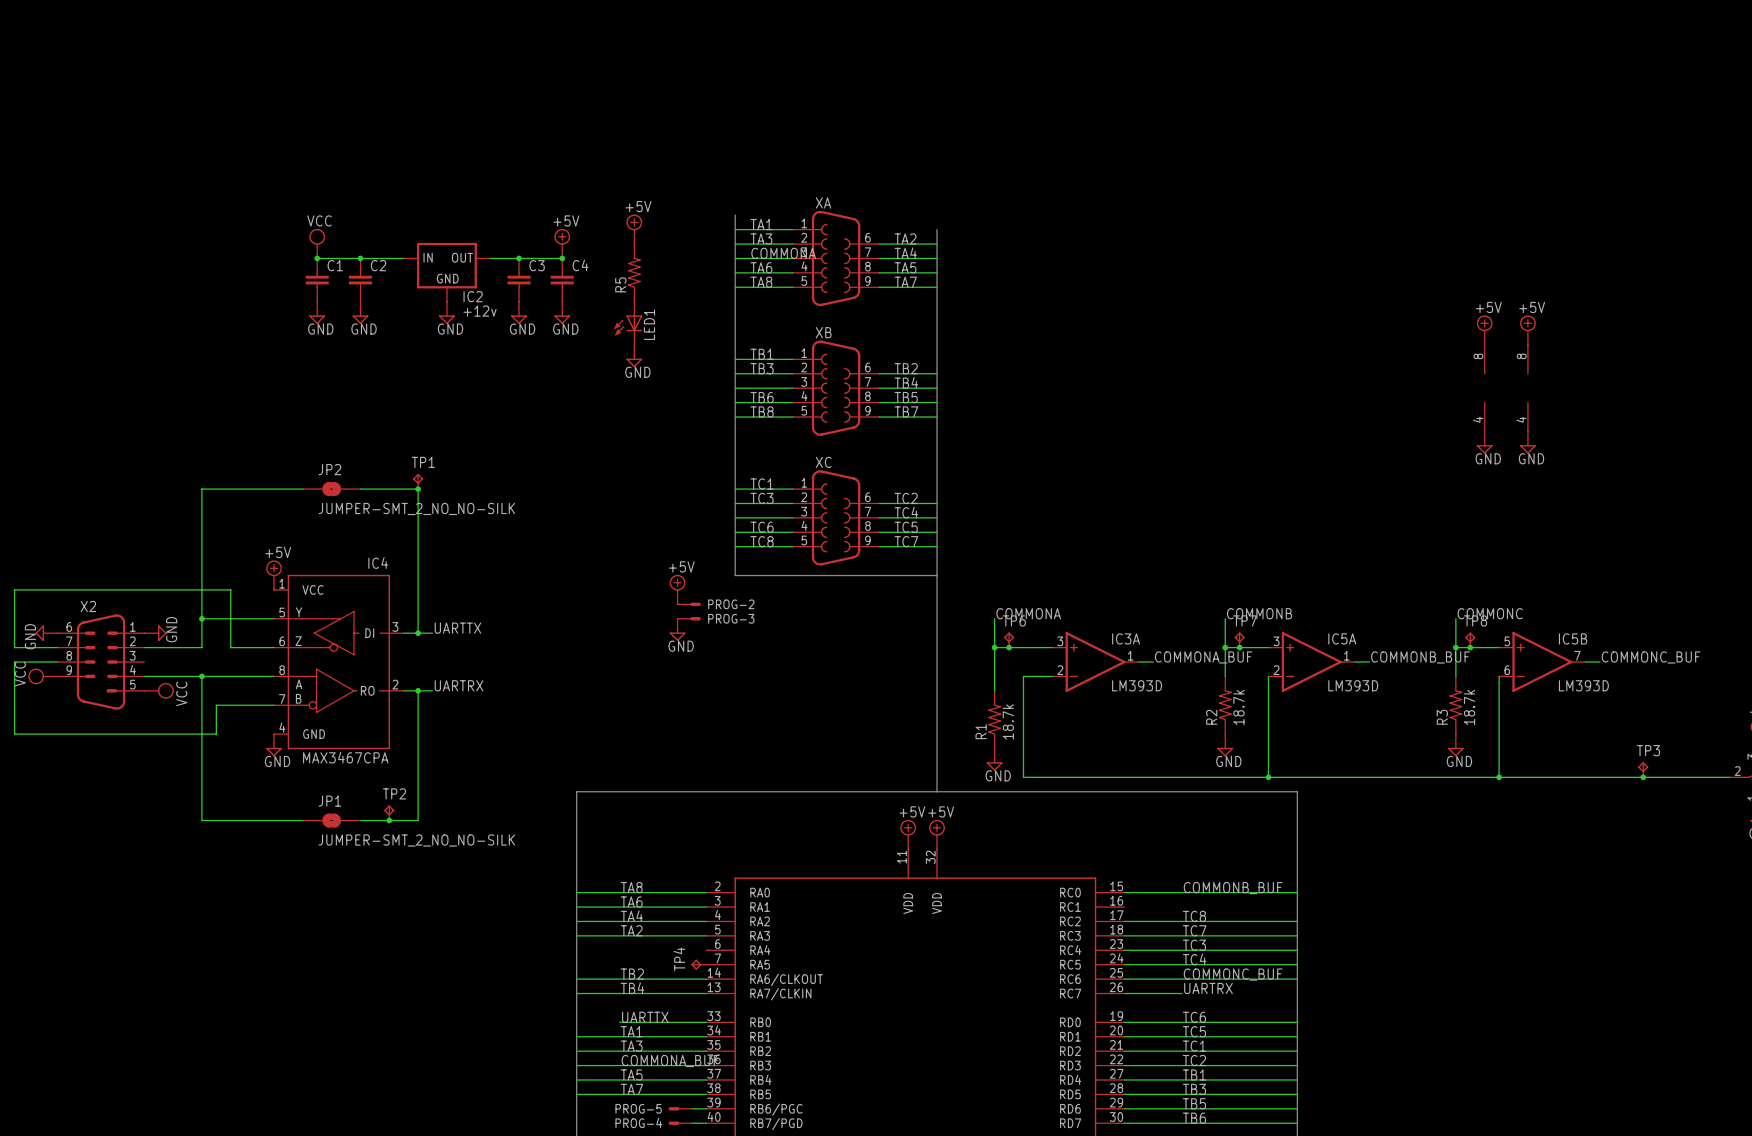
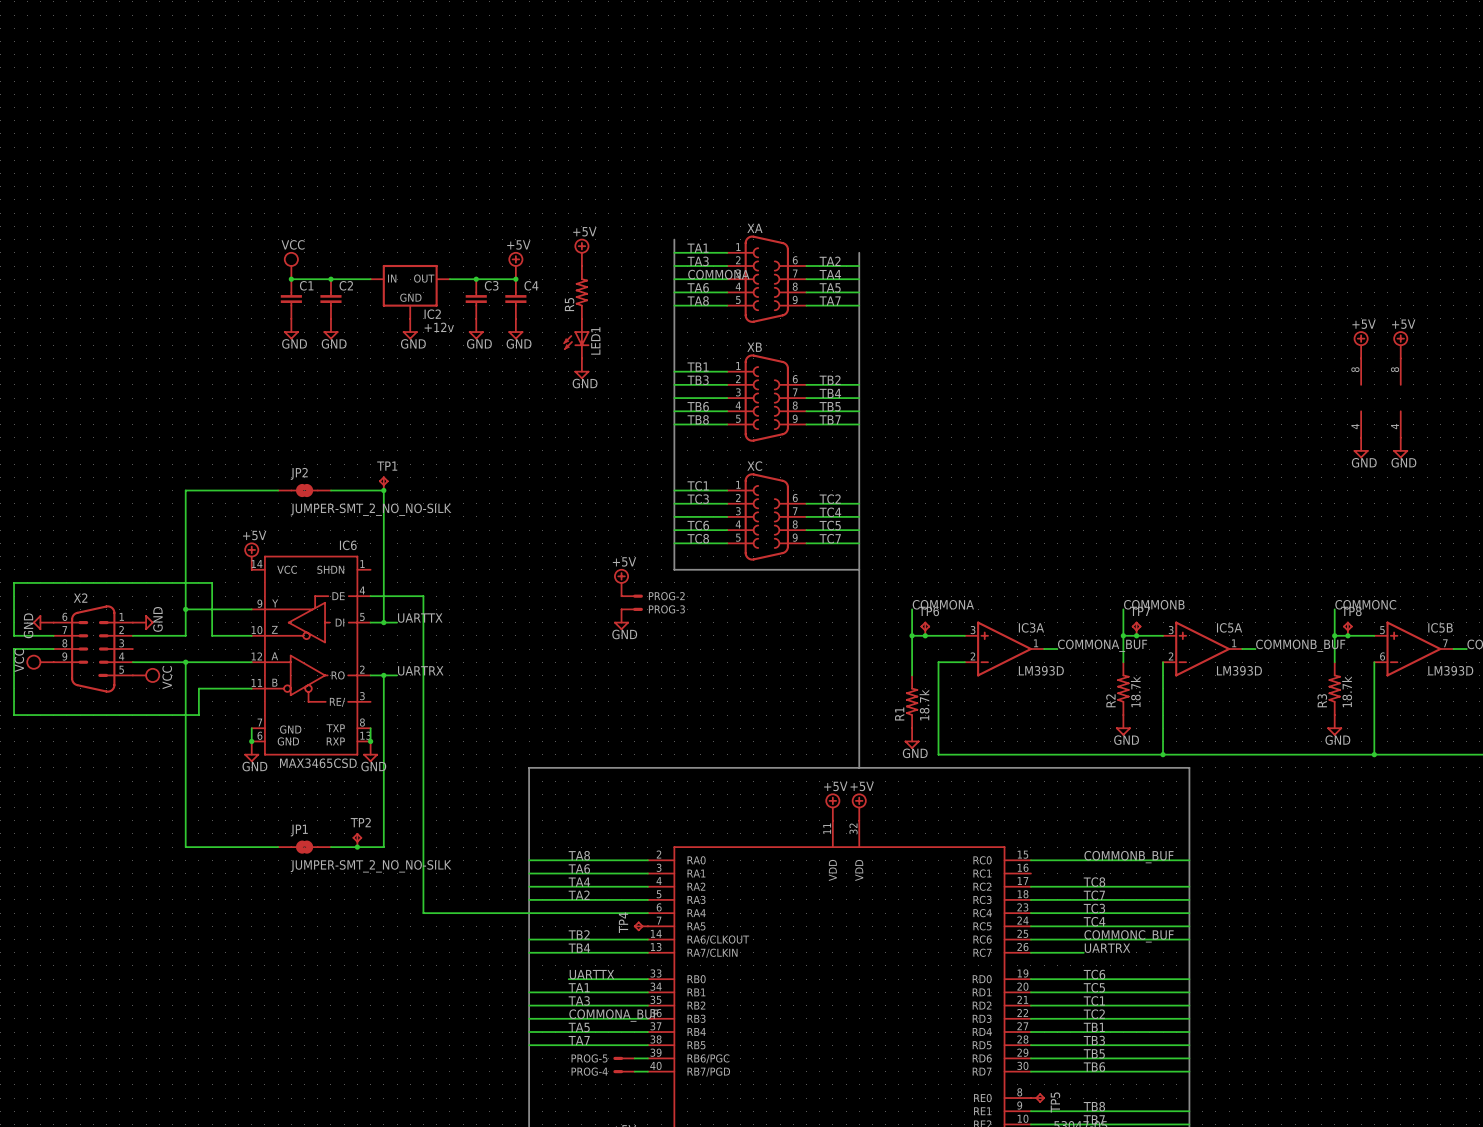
power symbol position: +5V (274, 575) -> +5V (251, 556)
wire: none -> (370, 596) (423, 596) (423, 913) (647, 913)
IC4: MAX3467CPA (338, 662) -> none
IC6: none -> MAX3465CSD (311, 655)
power symbol position: GND (274, 745) -> GND (251, 751)
wire: none -> (370, 728) (370, 741)
junction: none -> (251, 741)
junction: none -> (370, 741)
power symbol: none -> GND (370, 751)
TP2 position: (389, 812) -> (357, 840)
wire: (201, 820) (302, 820) -> (185, 794) (185, 847) (278, 847)
JP1 position: (331, 820) -> (304, 847)
wire: (360, 820) (418, 820) -> (330, 847) (383, 847) (383, 794)
junction: (389, 820) -> none
junction: none -> (357, 847)

